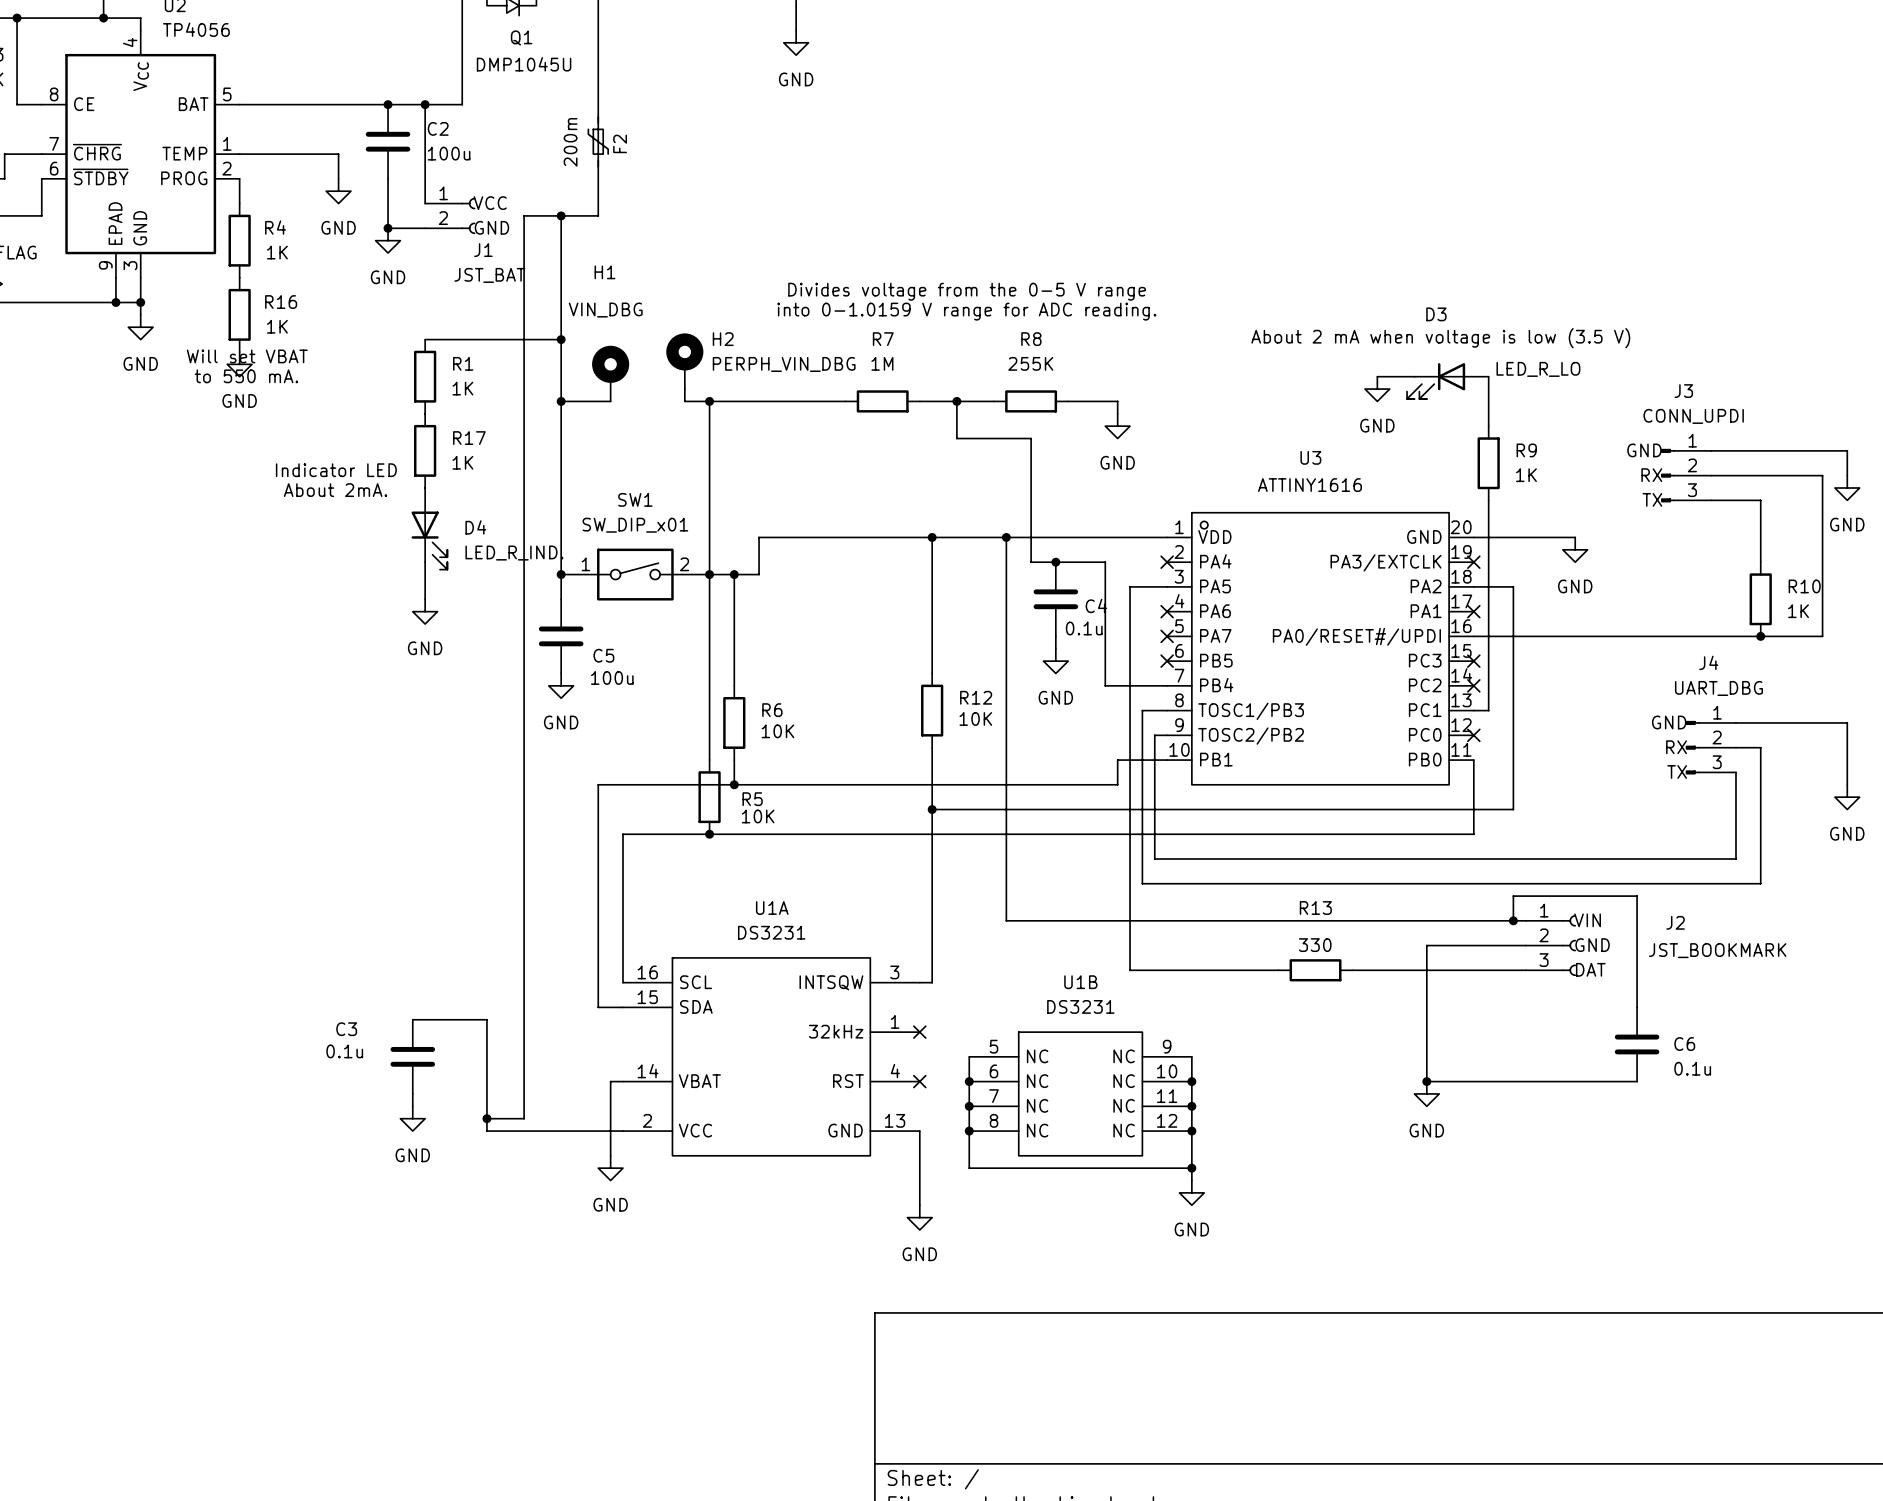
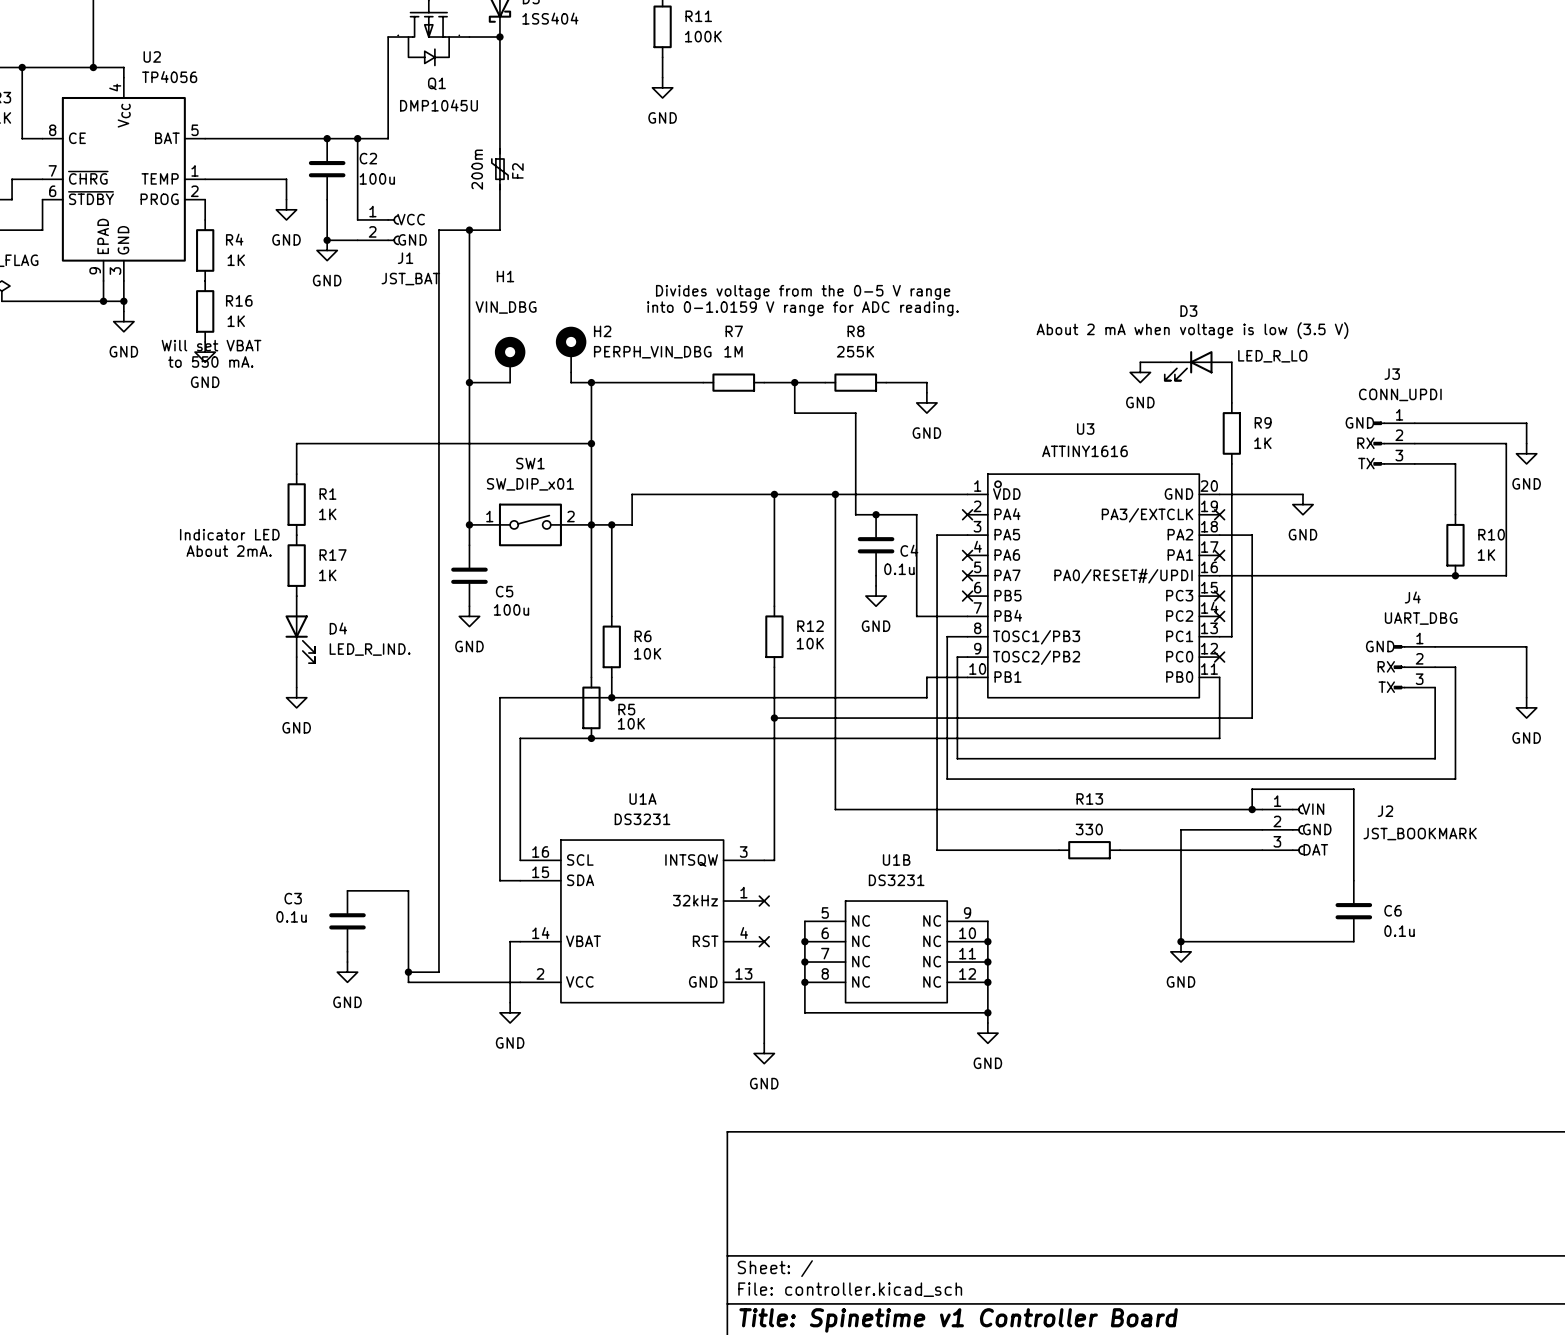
wire: (425, 339) (561, 339) -> none
junction: (561, 339) -> none
R1 position: (425, 376) -> (296, 504)
R17 position: (425, 450) -> (296, 565)
text position: Indicator LED (336, 470) -> Indicator LED (229, 534)
wire: none -> (591, 443) (296, 443) (296, 474)
junction: none -> (591, 443)
text position: About 2mA. (335, 490) -> About 2mA. (229, 551)
D4 position: (429, 528) -> (300, 629)
wire: (425, 562) (425, 599) -> (296, 657) (296, 687)
power symbol position: GND (425, 611) -> GND (296, 697)

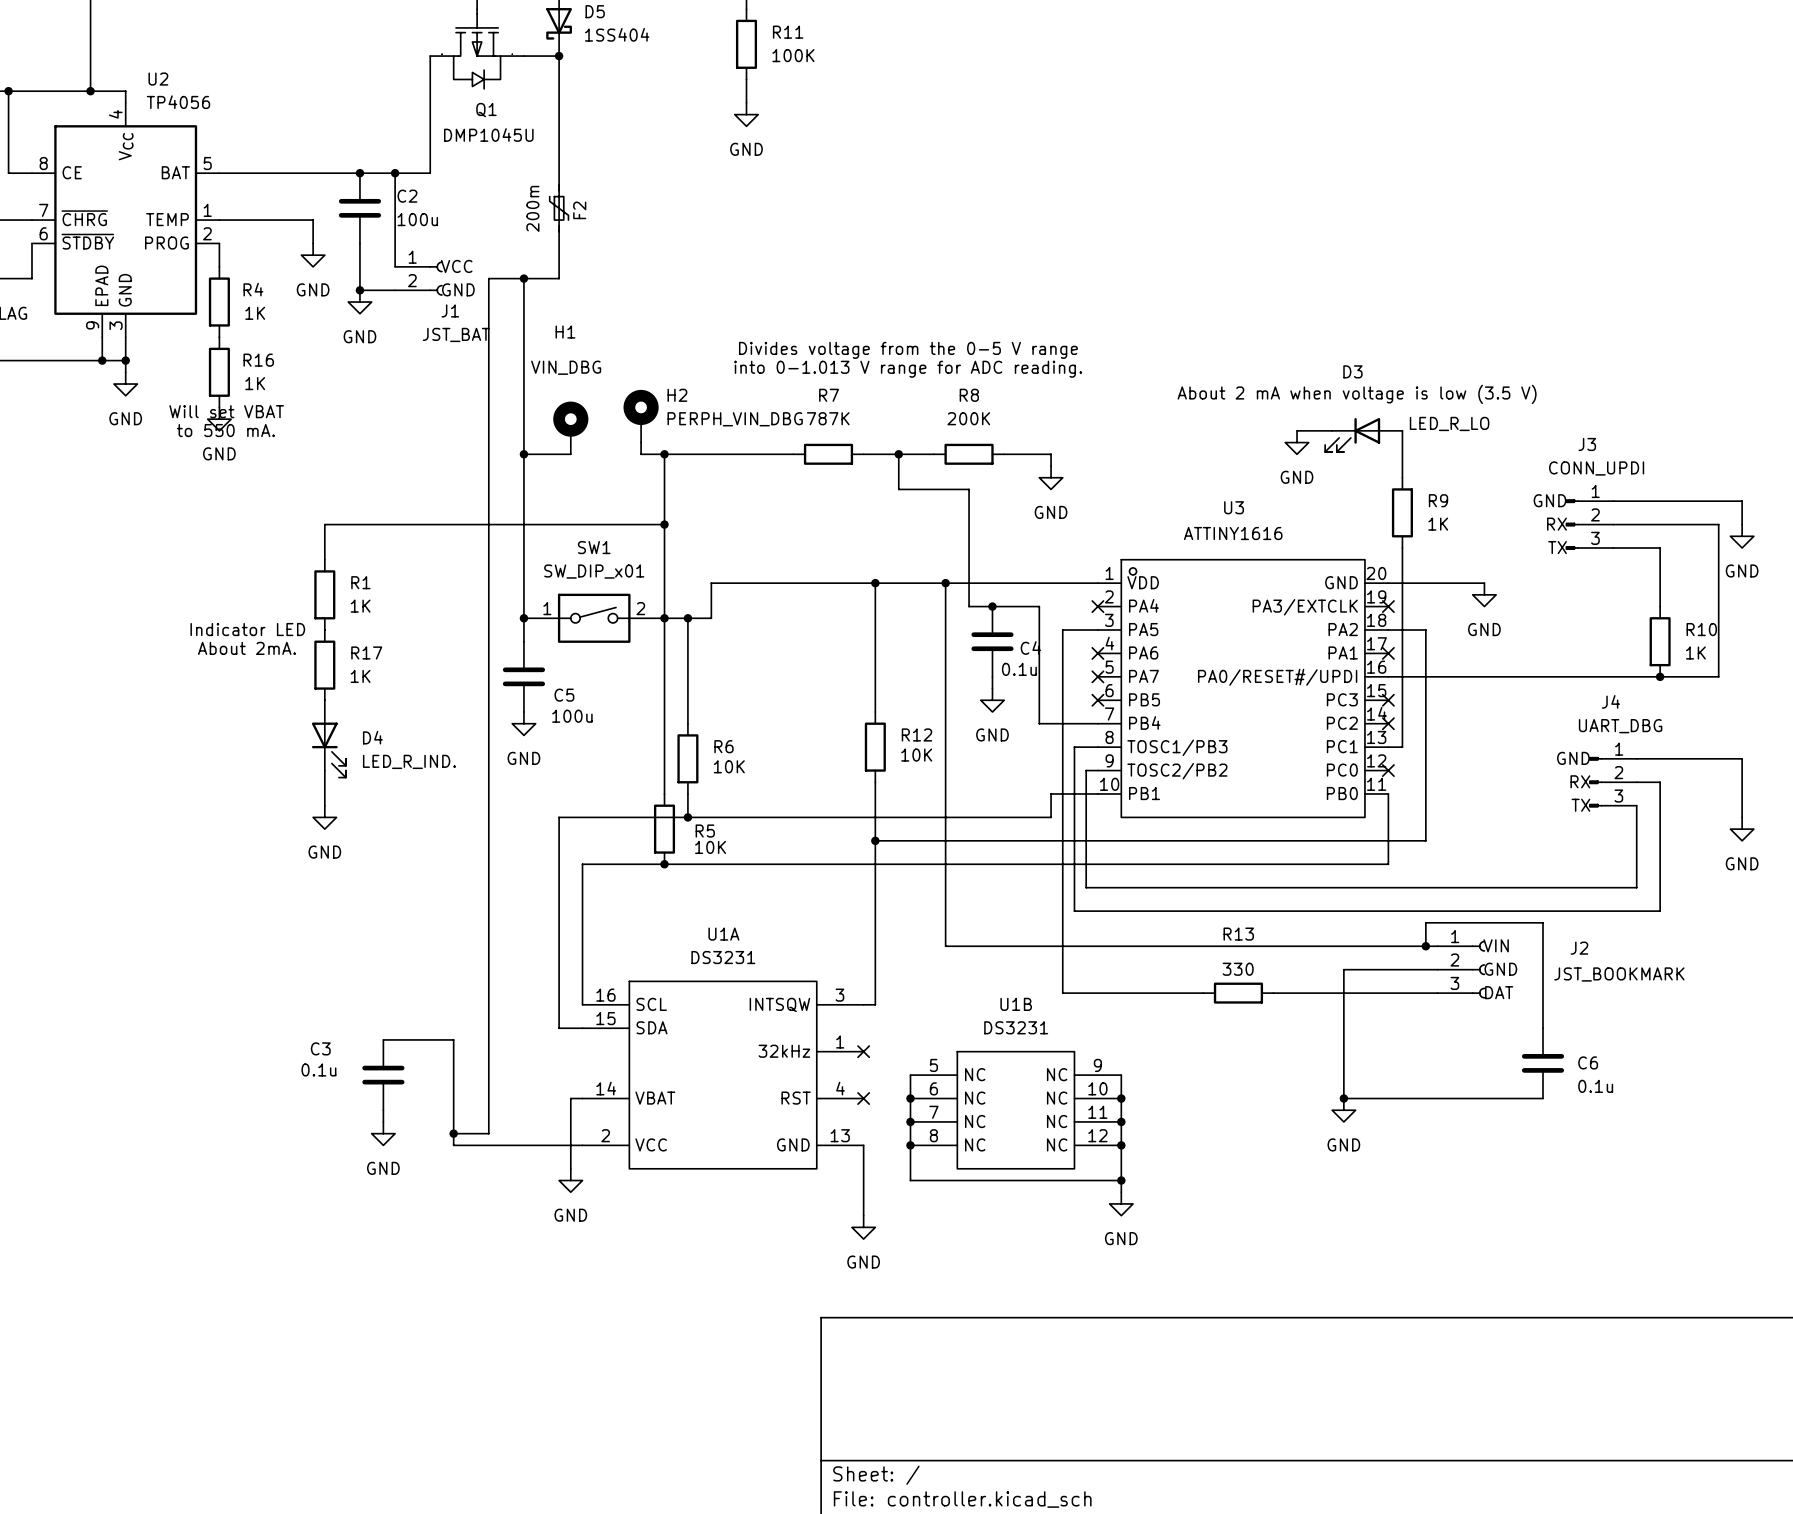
text: into 0-1.0159 V range for ADC reading. (802, 308) -> into 0-1.013 V range for ADC reading. (908, 369)
R7 value: 1M (733, 351) -> 787K (828, 418)
R8 value: 255K (855, 351) -> 200K (968, 418)

